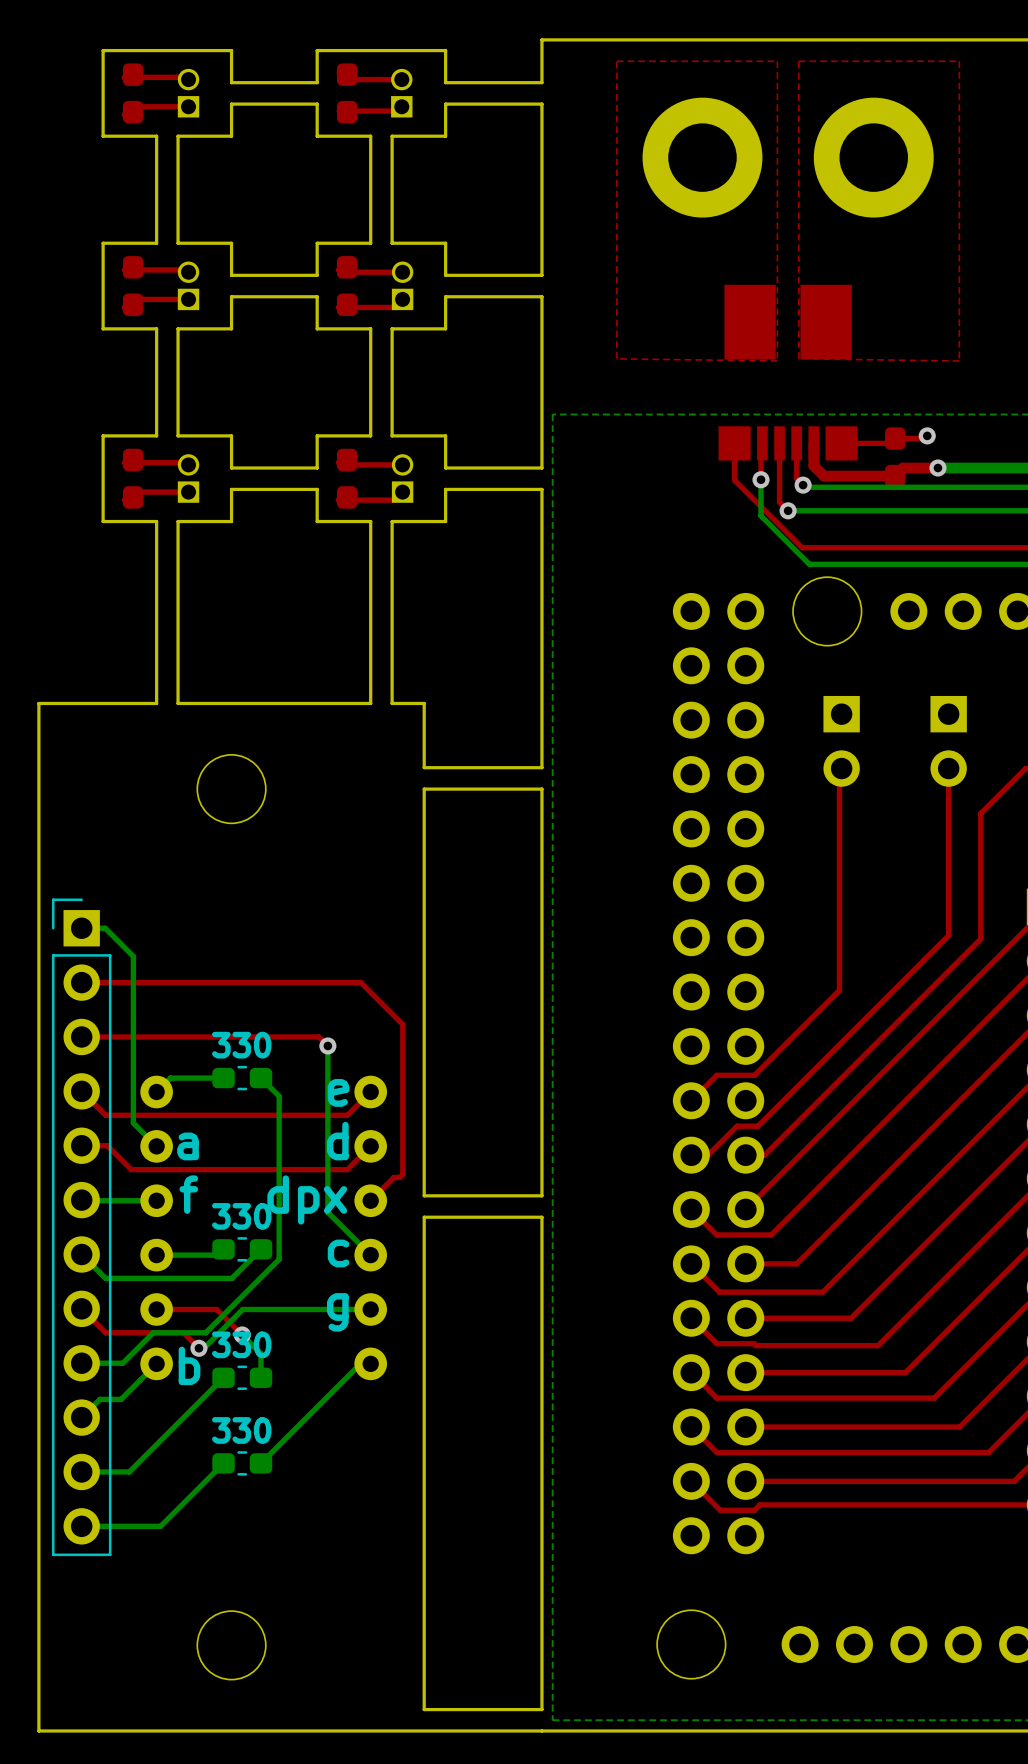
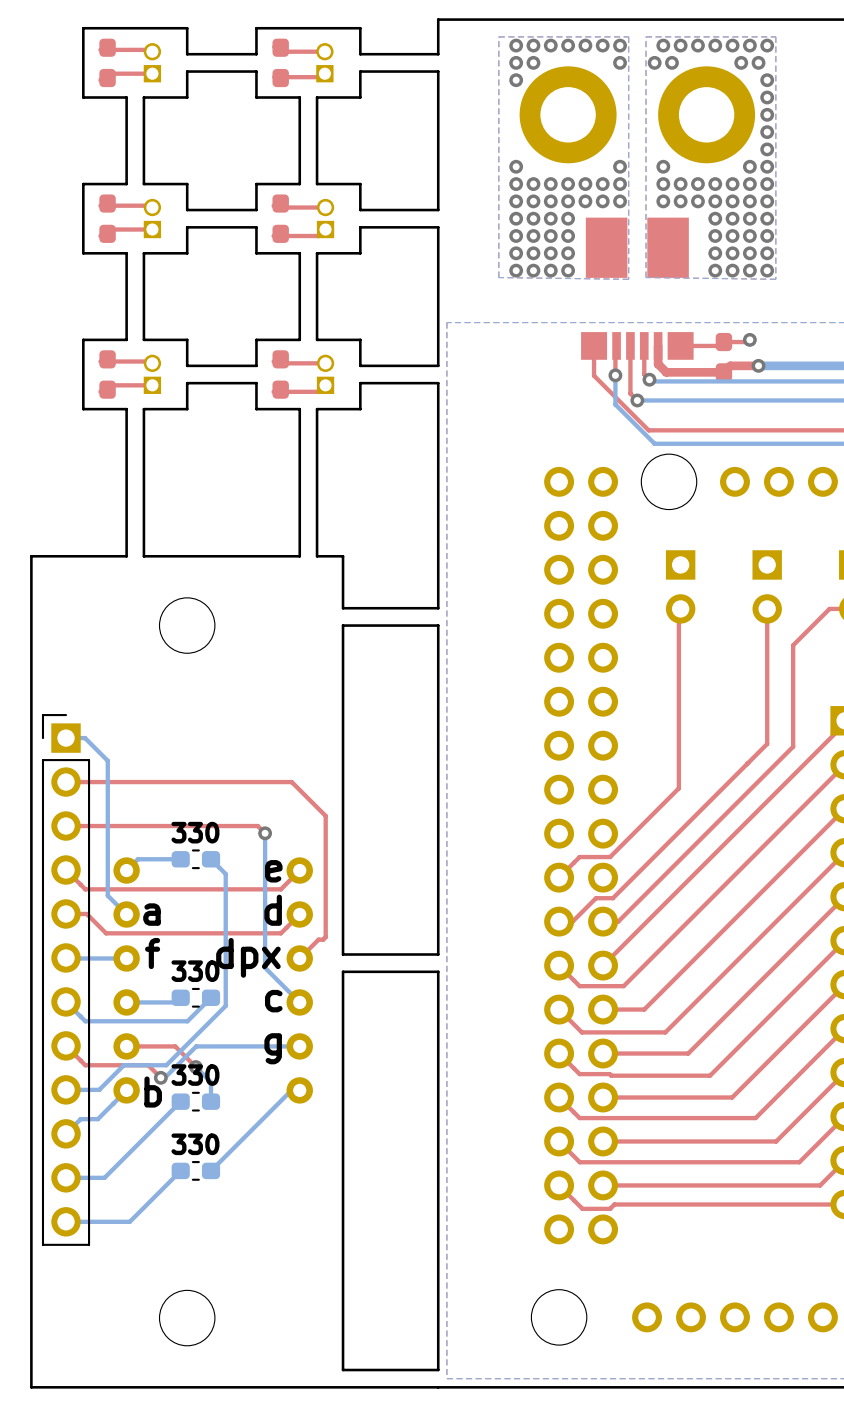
bottom zone outline: none -> (628, 36) (498, 36) (498, 277) (628, 279) (628, 36)
bottom zone outline: none -> (775, 36) (646, 36) (646, 277) (775, 279) (775, 36)
via: none -> (516, 45)
via: none -> (533, 45)
via: none -> (550, 45)
via: none -> (568, 45)
via: none -> (585, 45)
via: none -> (602, 45)
via: none -> (620, 45)
via: none -> (663, 45)
via: none -> (680, 45)
via: none -> (697, 45)
via: none -> (715, 45)
via: none -> (732, 45)
via: none -> (749, 45)
via: none -> (767, 45)
via: none -> (516, 62)
via: none -> (533, 62)
via: none -> (620, 62)
via: none -> (654, 62)
via: none -> (671, 62)
via: none -> (741, 62)
via: none -> (758, 62)
via: none -> (516, 80)
via: none -> (767, 80)
via: none -> (767, 97)
via: none -> (767, 114)
via: none -> (767, 132)
via: none -> (767, 149)
via: none -> (516, 166)
via: none -> (620, 166)
via: none -> (663, 166)
via: none -> (749, 166)
via: none -> (767, 166)
via: none -> (516, 184)
via: none -> (533, 184)
via: none -> (550, 184)
via: none -> (568, 184)
via: none -> (585, 184)
via: none -> (602, 184)
via: none -> (620, 184)
via: none -> (663, 184)
via: none -> (680, 184)
via: none -> (697, 184)
via: none -> (715, 184)
via: none -> (732, 184)
via: none -> (749, 184)
via: none -> (767, 184)
via: none -> (516, 201)
via: none -> (533, 201)
via: none -> (550, 201)
via: none -> (568, 201)
via: none -> (585, 201)
via: none -> (602, 201)
via: none -> (620, 201)
via: none -> (663, 201)
via: none -> (680, 201)
via: none -> (697, 201)
via: none -> (715, 201)
via: none -> (732, 201)
via: none -> (749, 201)
via: none -> (767, 201)
via: none -> (516, 218)
via: none -> (533, 218)
via: none -> (550, 218)
via: none -> (568, 218)
via: none -> (715, 218)
via: none -> (732, 218)
via: none -> (749, 218)
via: none -> (767, 218)
via: none -> (516, 236)
via: none -> (533, 236)
via: none -> (550, 236)
via: none -> (568, 236)
via: none -> (715, 236)
via: none -> (732, 236)
via: none -> (749, 236)
via: none -> (767, 236)
via: none -> (516, 253)
via: none -> (533, 253)
via: none -> (550, 253)
via: none -> (568, 253)
via: none -> (715, 253)
via: none -> (732, 253)
via: none -> (749, 253)
via: none -> (767, 253)
via: none -> (516, 270)
via: none -> (533, 270)
via: none -> (550, 270)
via: none -> (568, 270)
via: none -> (715, 270)
via: none -> (732, 270)
via: none -> (749, 270)
via: none -> (767, 270)

